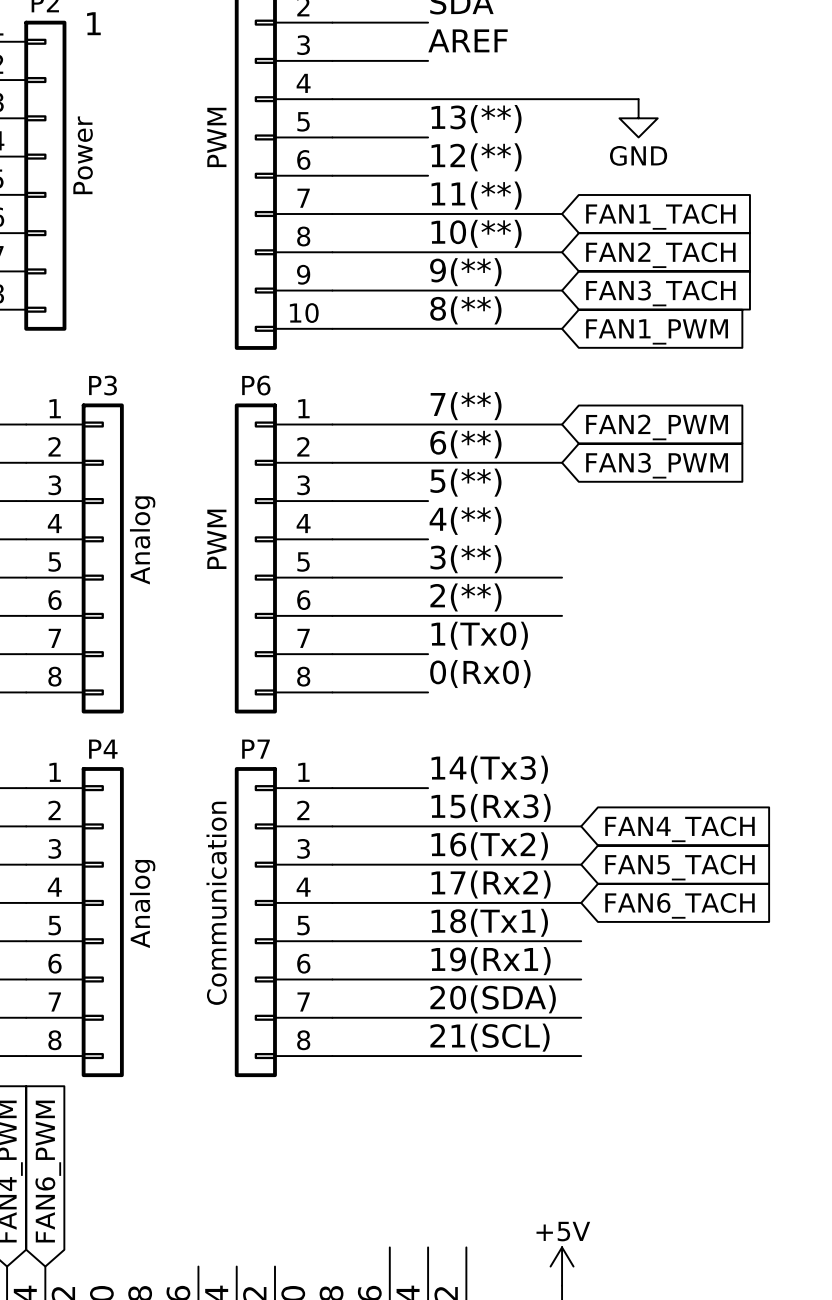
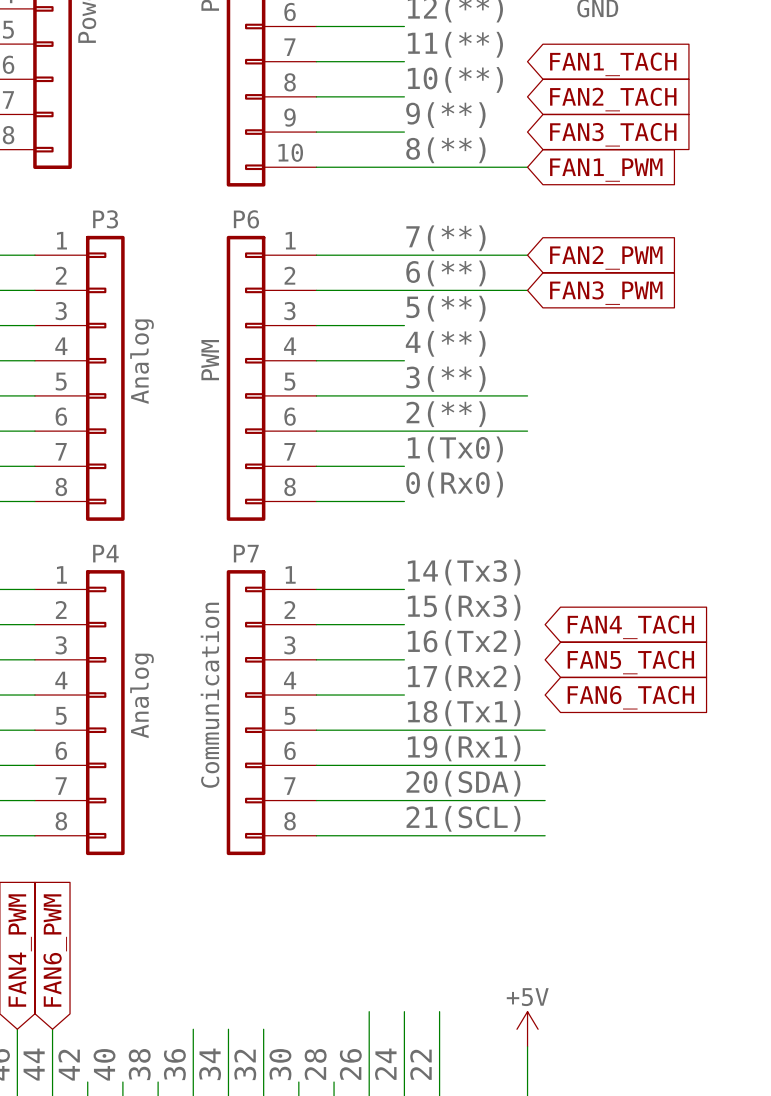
wire: (428, 214) (562, 214) -> none
wire: (428, 252) (562, 252) -> none
wire: (428, 290) (562, 290) -> none
wire: (428, 826) (581, 826) -> none
wire: (428, 864) (581, 864) -> none
wire: (428, 902) (581, 902) -> none

